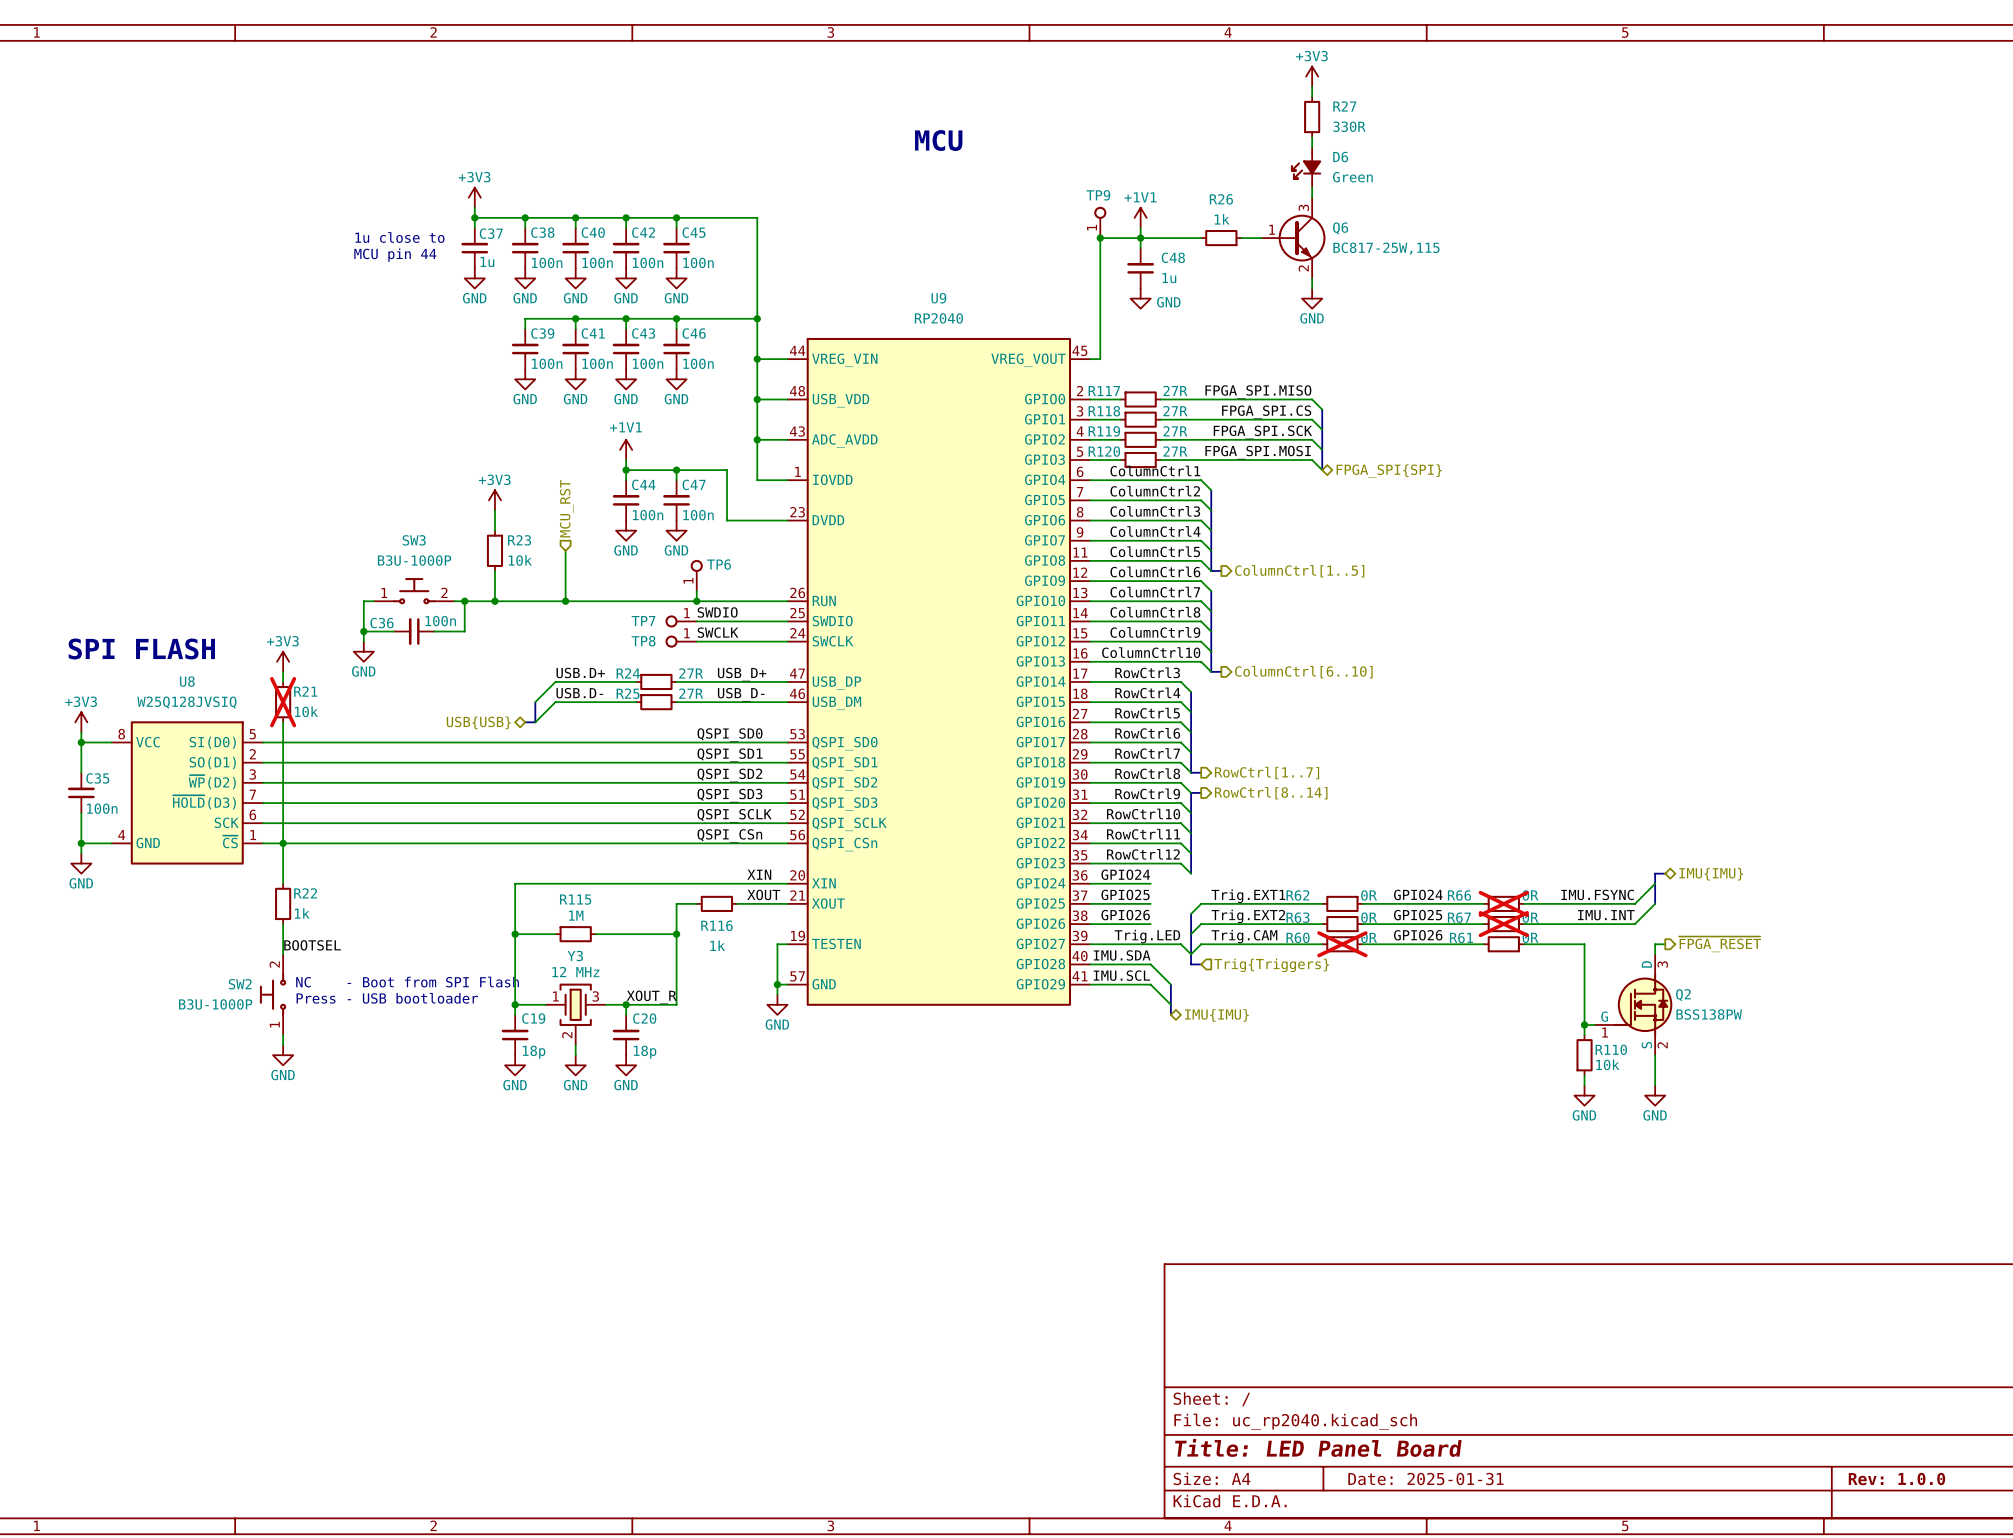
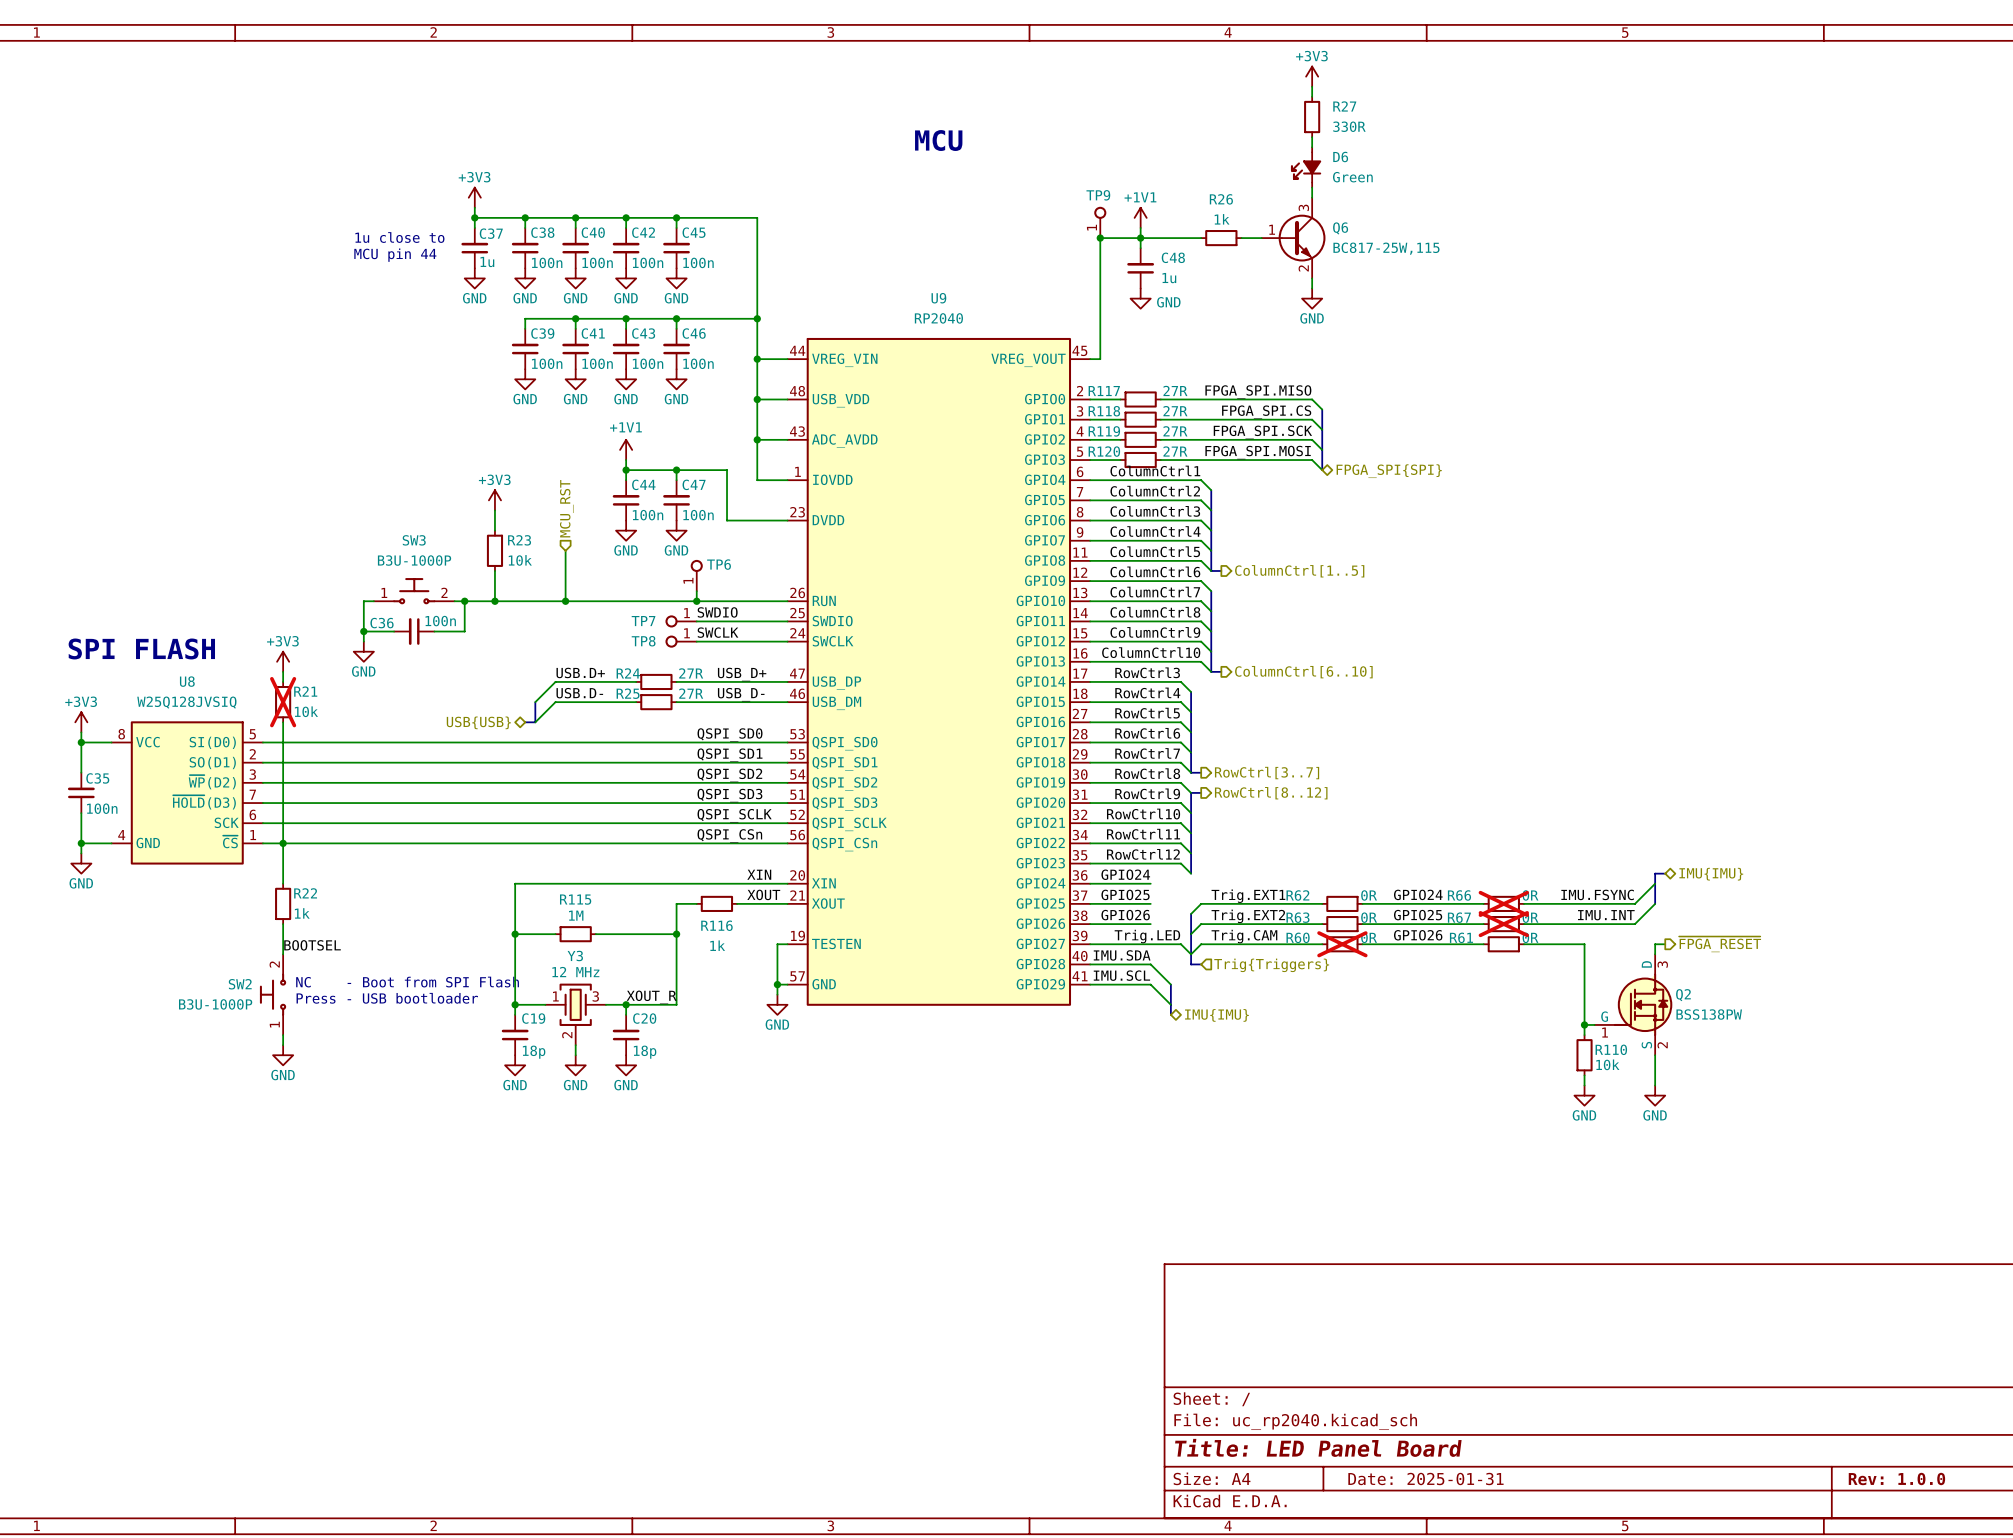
hierarchical label: RowCtrl[1..7] (1267, 773) -> RowCtrl[3..7] (1267, 773)
hierarchical label: RowCtrl[8..14] (1271, 793) -> RowCtrl[8..12] (1271, 793)

